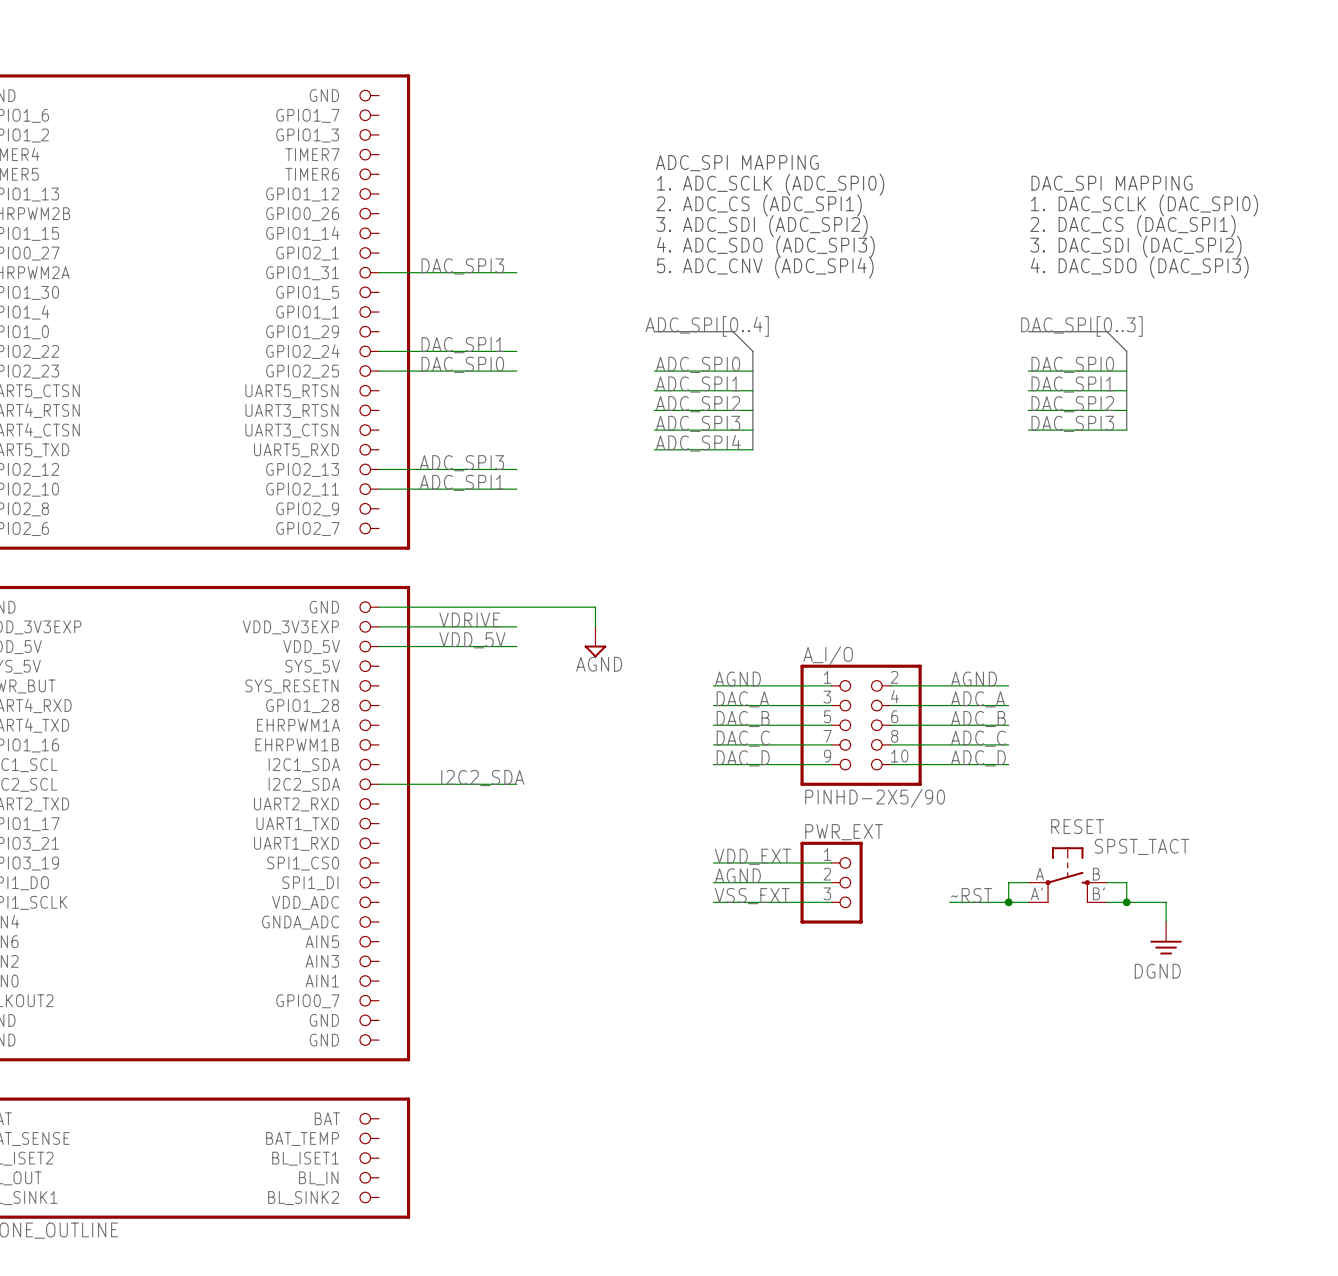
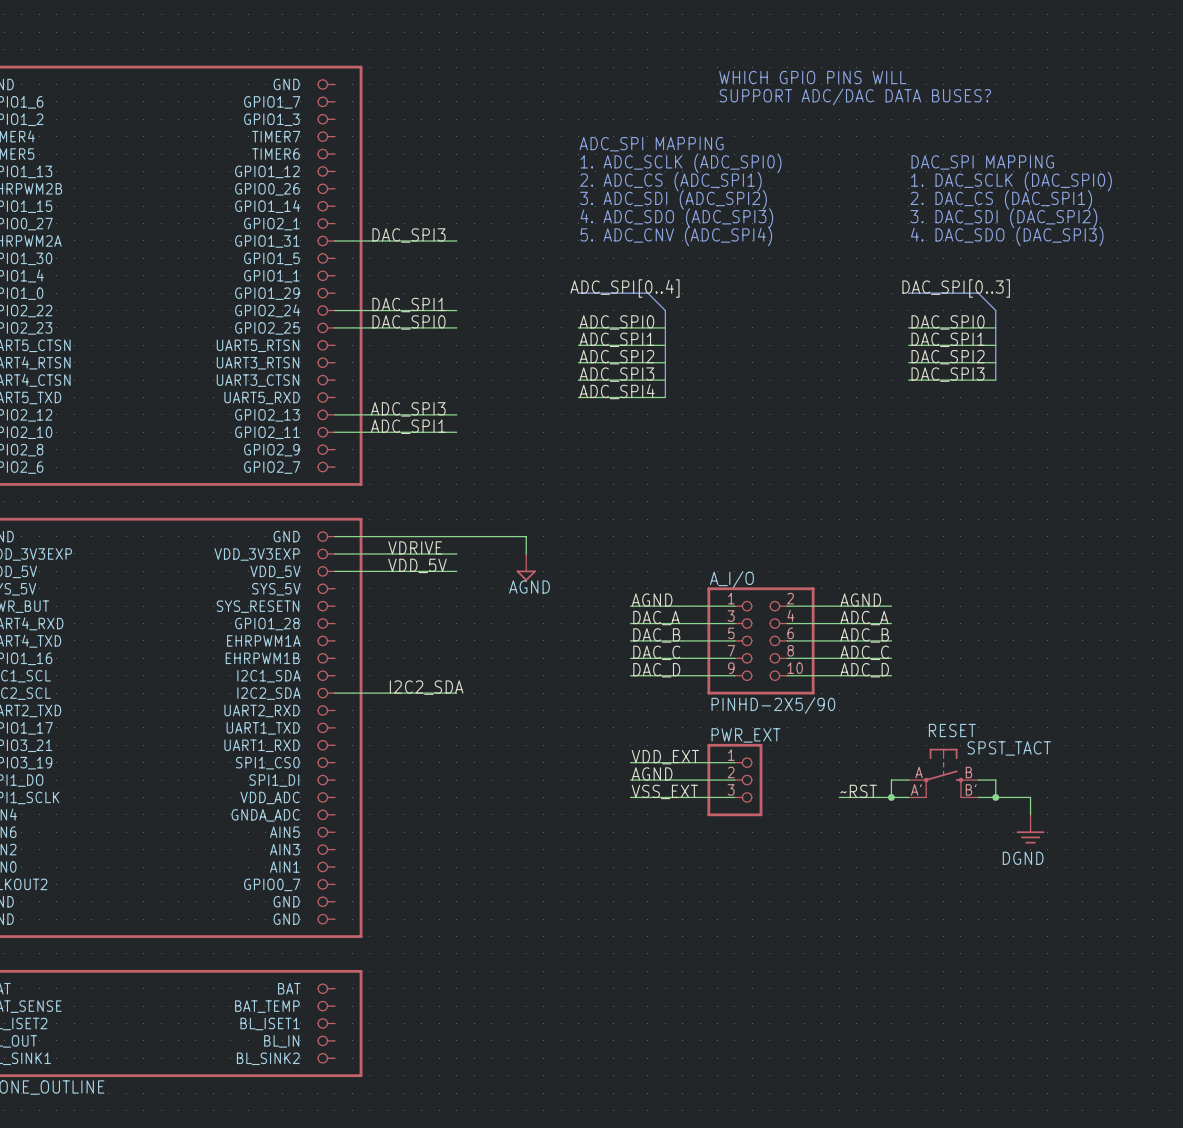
text: none -> WHICH GPIO PINS WILL (812, 77)
text: none -> SUPPORT ADC/DAC DATA BUSES? (855, 96)

